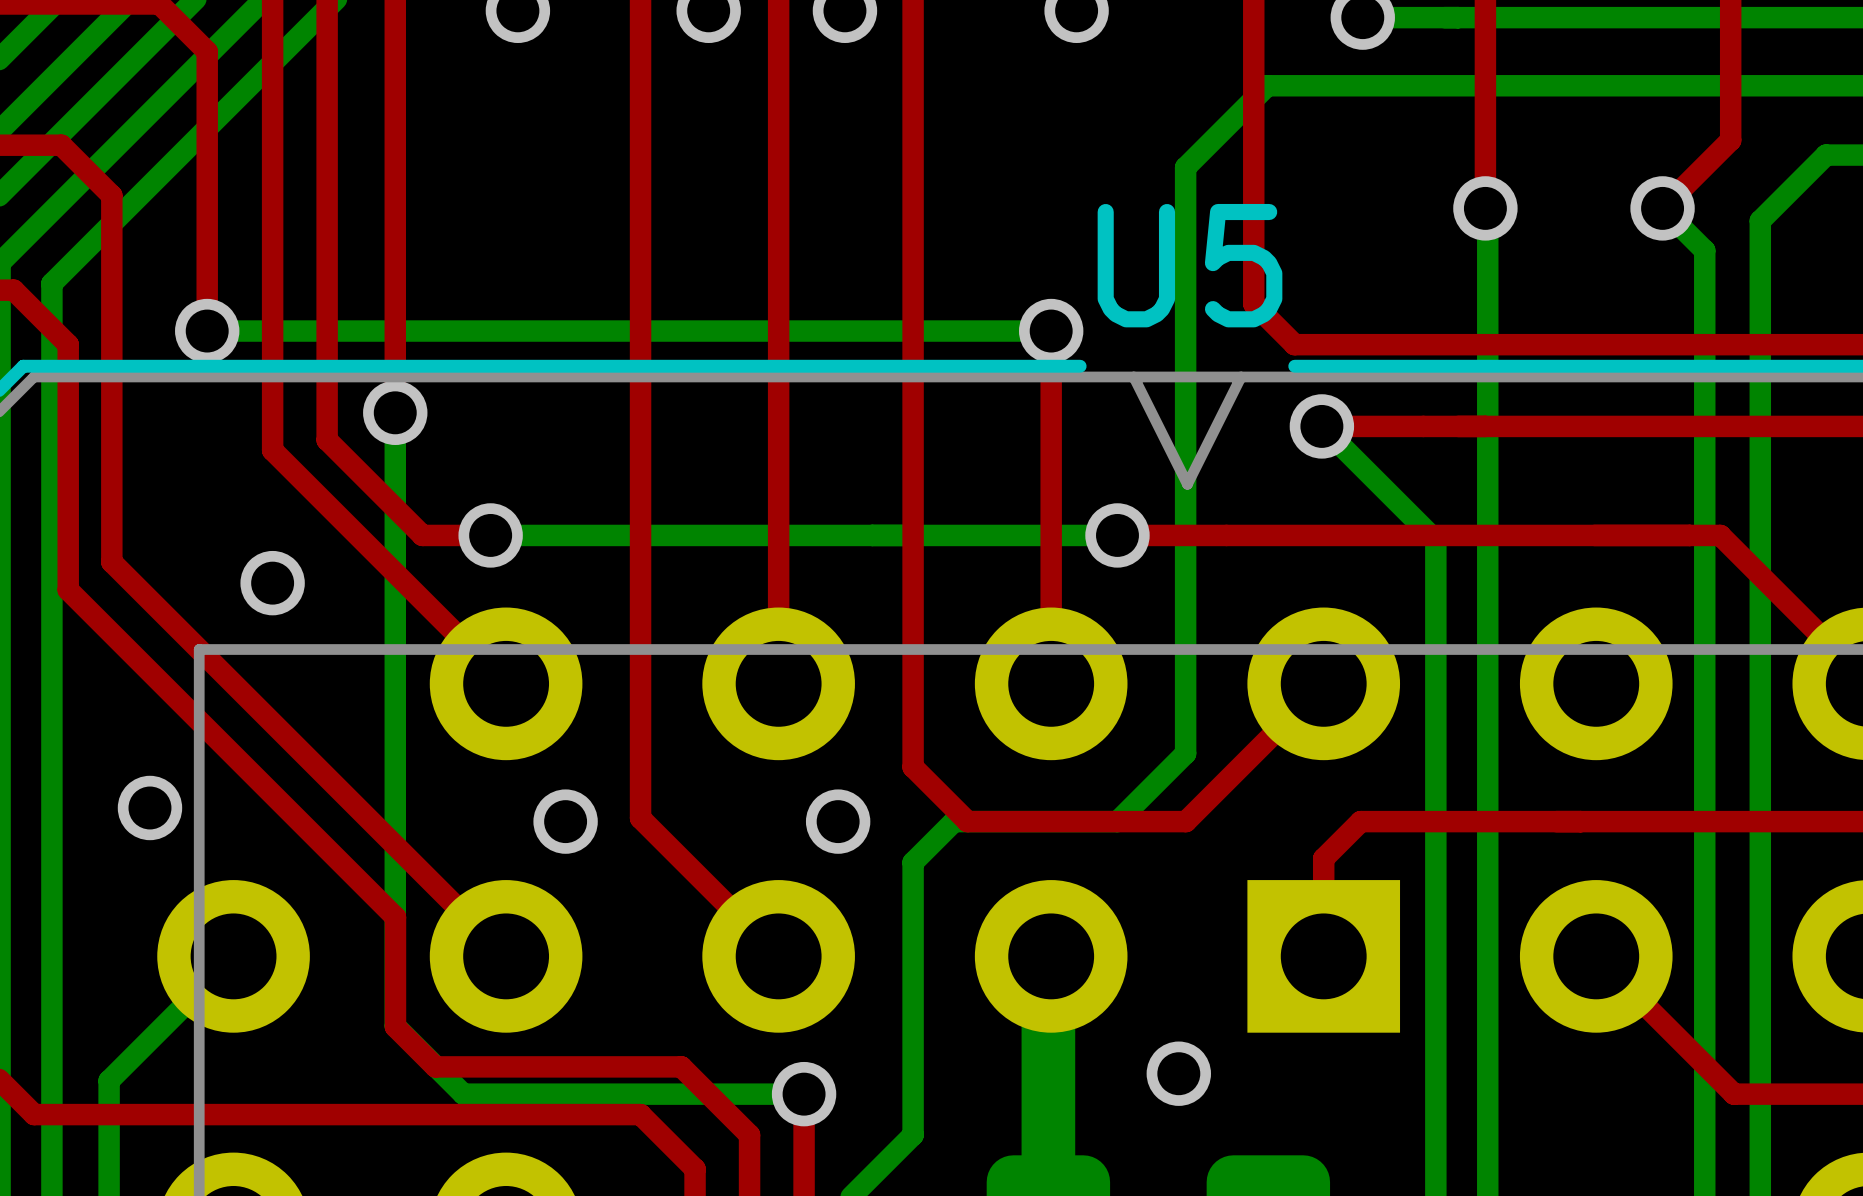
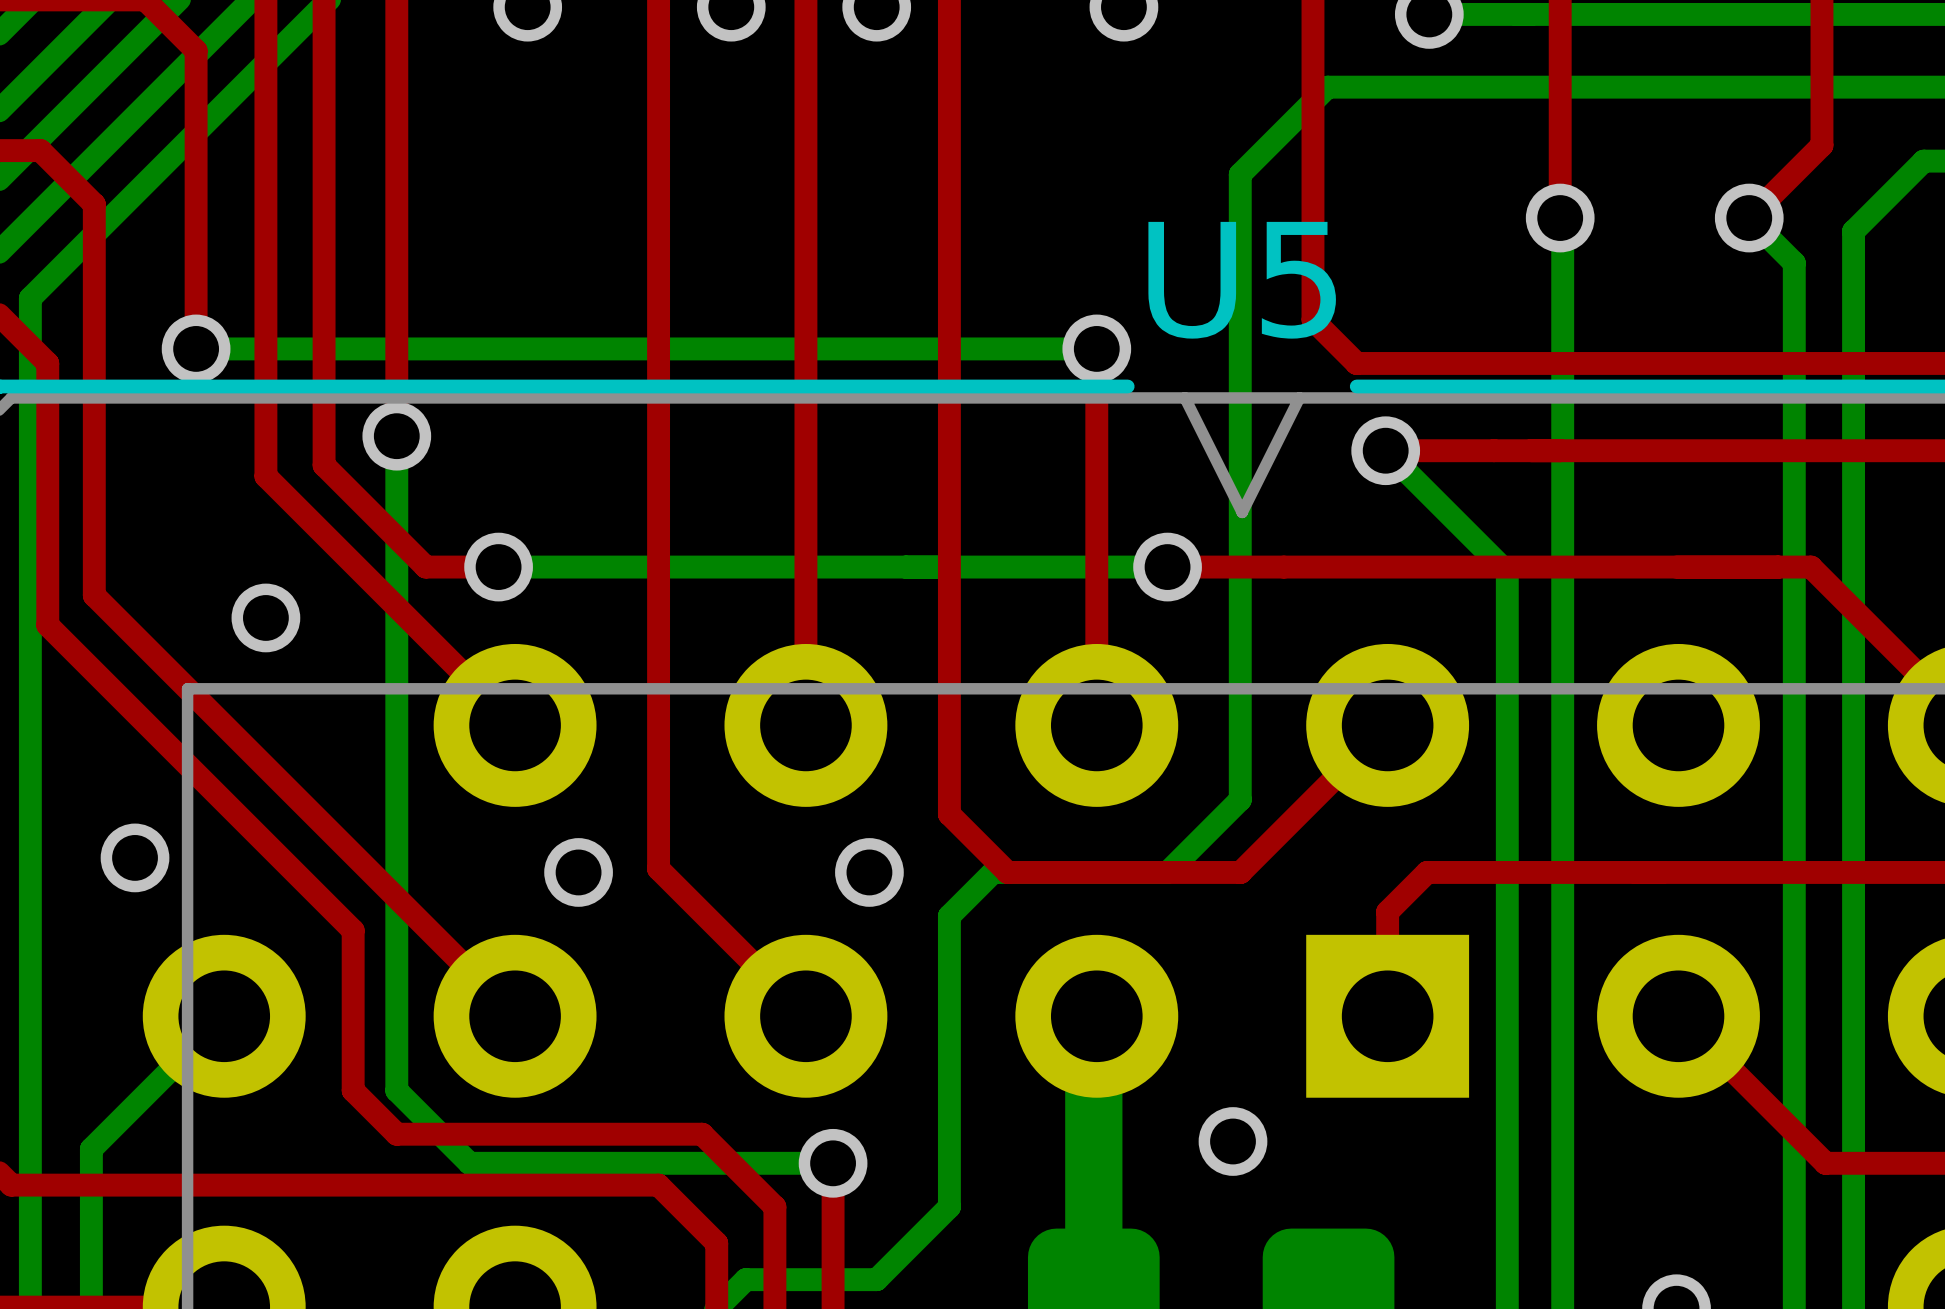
top track: (354, 876) (395, 917) (395, 1026) (435, 1066) -> (353, 930) (353, 1090) (396, 1134) (439, 1134)

